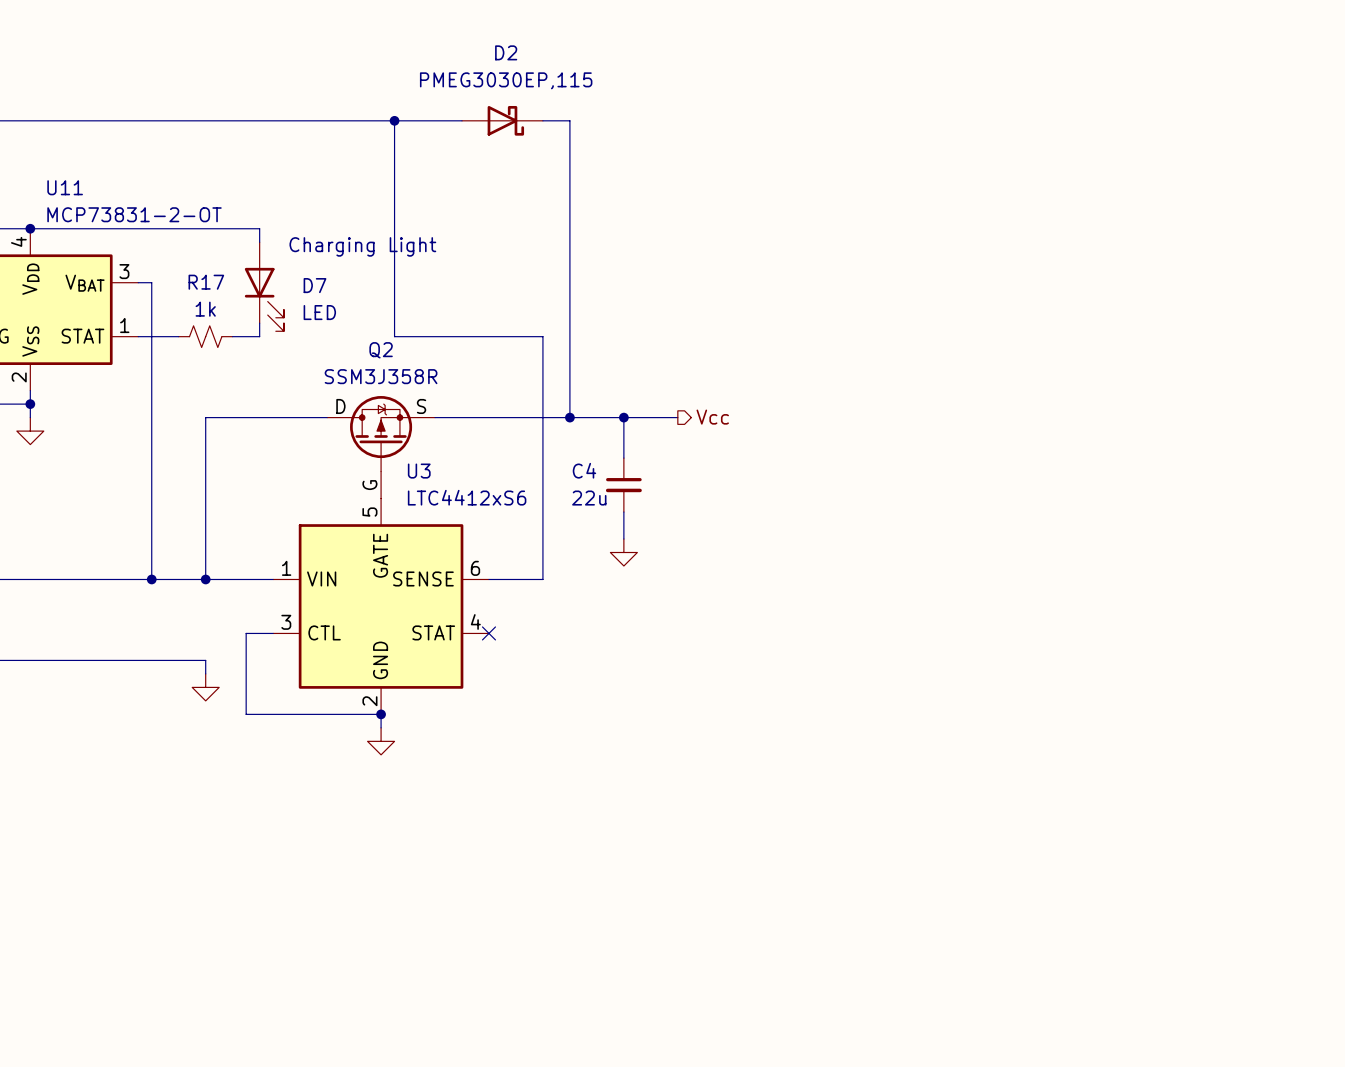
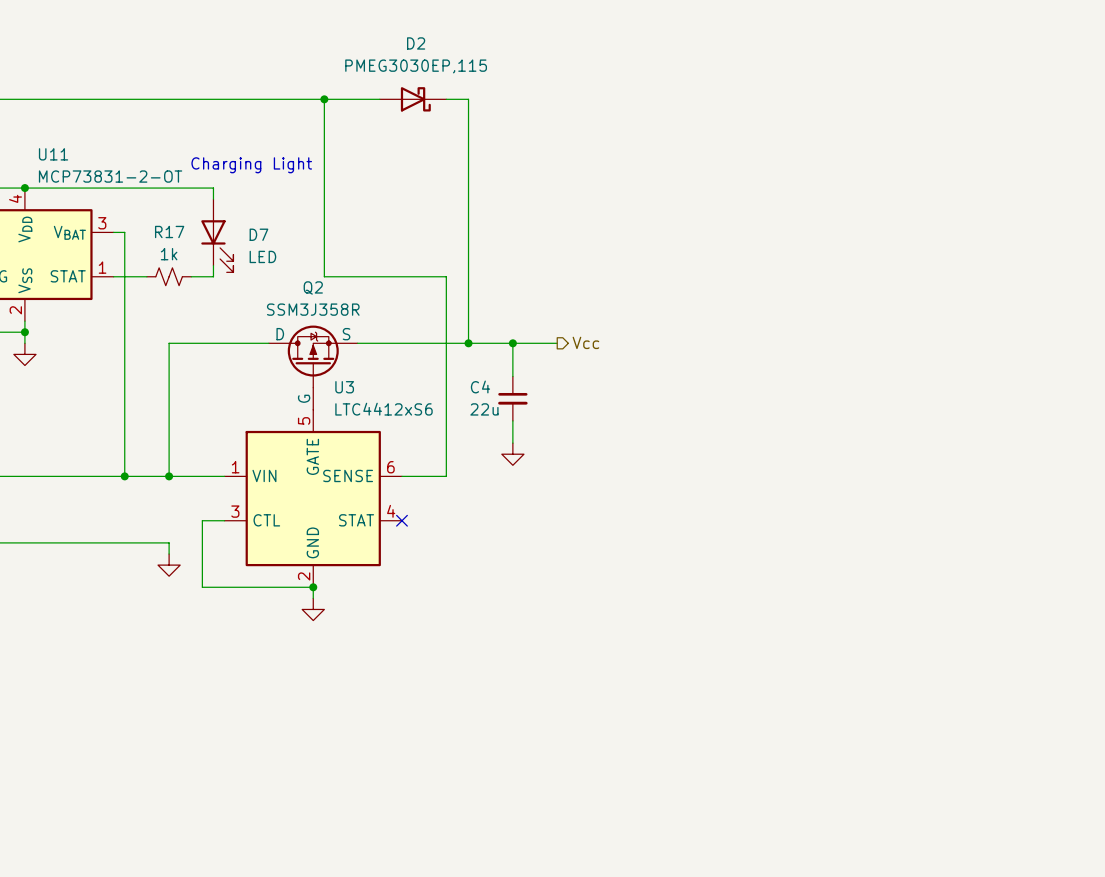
text position: Charging Light (362, 246) -> Charging Light (251, 165)

